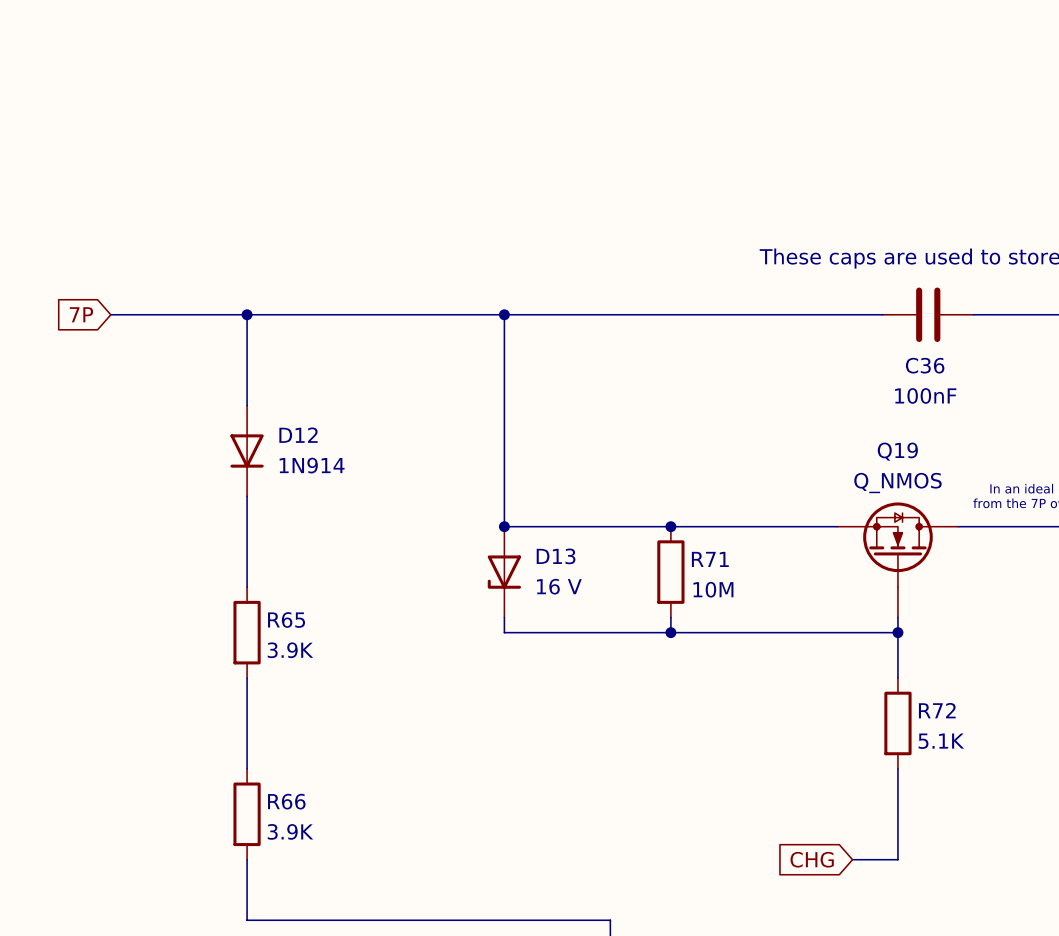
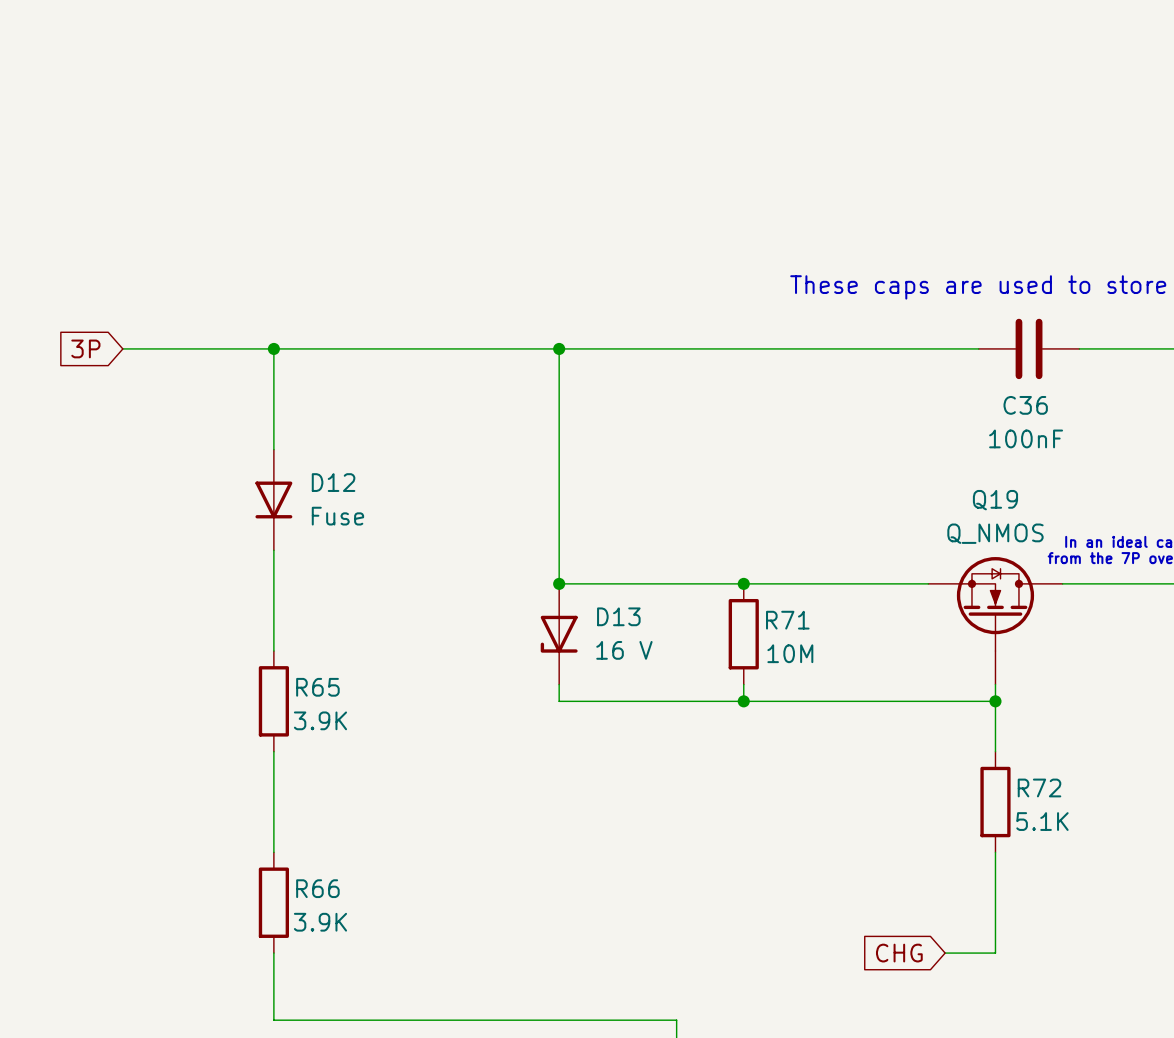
global label: 7P (81, 314) -> 3P (85, 348)
D12 value: 1N914 (312, 465) -> Fuse (337, 516)

